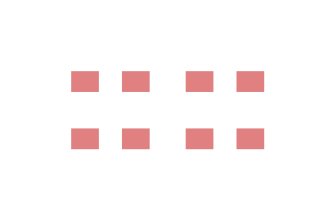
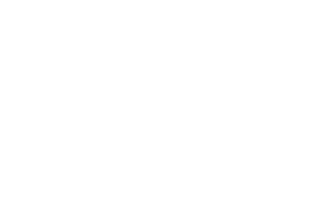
part: (110, 81) -> none
part: (224, 81) -> none
part: (110, 138) -> none
part: (224, 138) -> none

